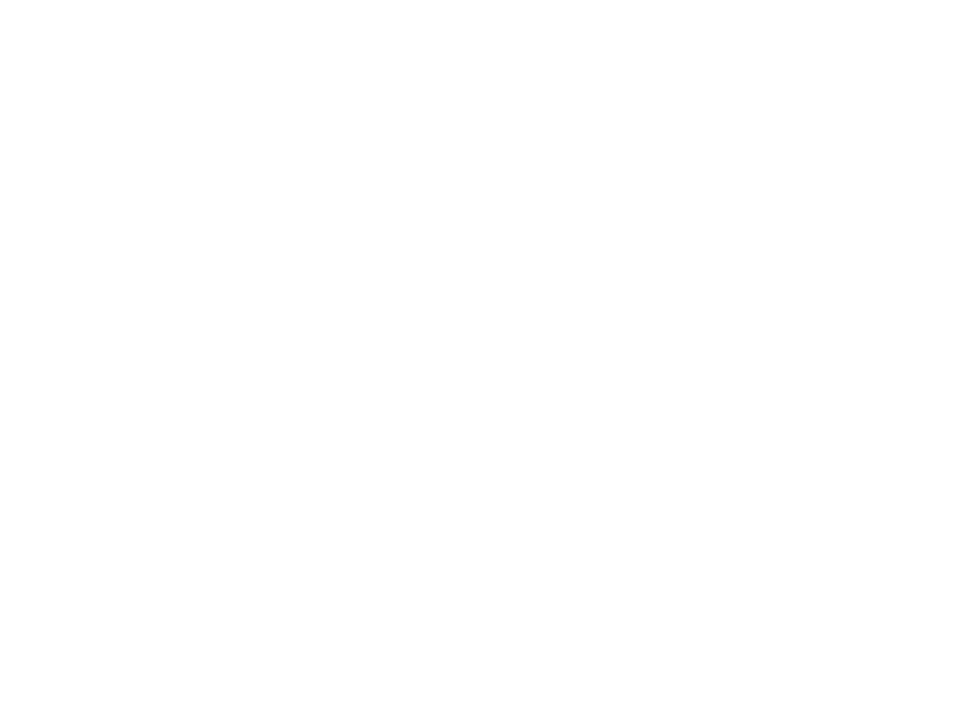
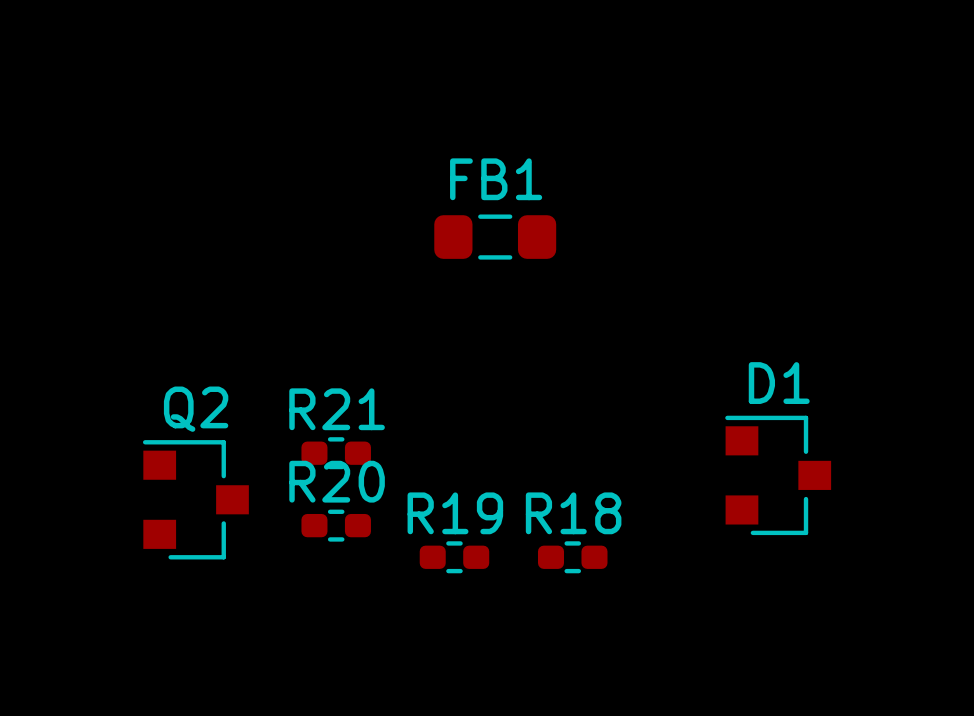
FB1: none -> (495, 237)
R21: none -> (336, 453)
D1: none -> (778, 475)
Q2: none -> (195, 499)
R20: none -> (336, 525)
R19: none -> (454, 557)
R18: none -> (572, 557)

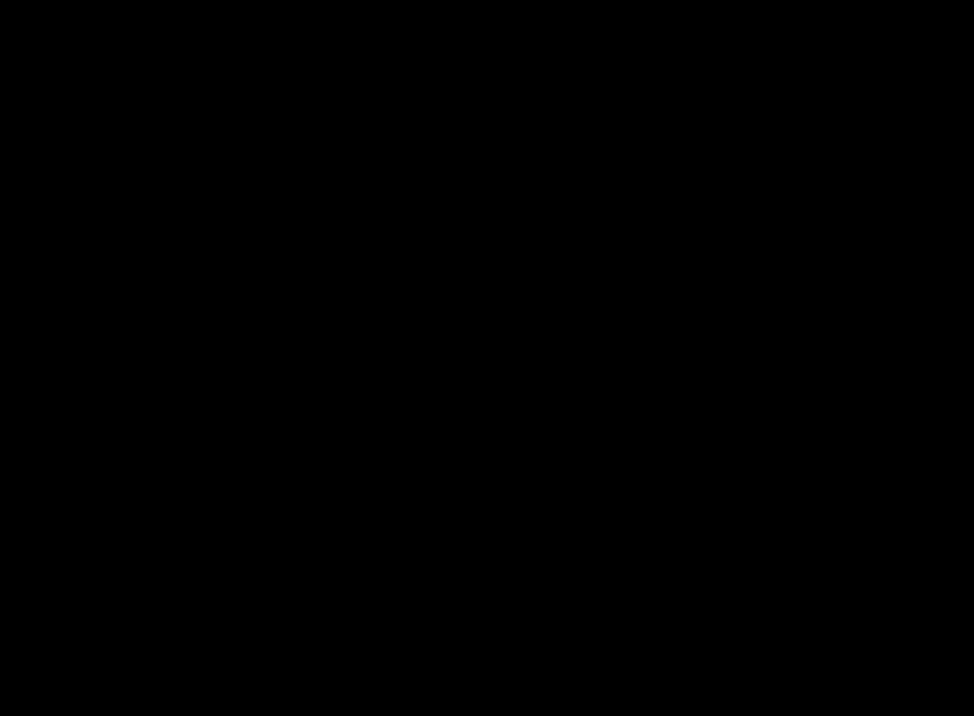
FB1: (495, 237) -> none
R21: (336, 453) -> none
D1: (778, 475) -> none
Q2: (195, 499) -> none
R20: (336, 525) -> none
R19: (454, 557) -> none
R18: (572, 557) -> none

